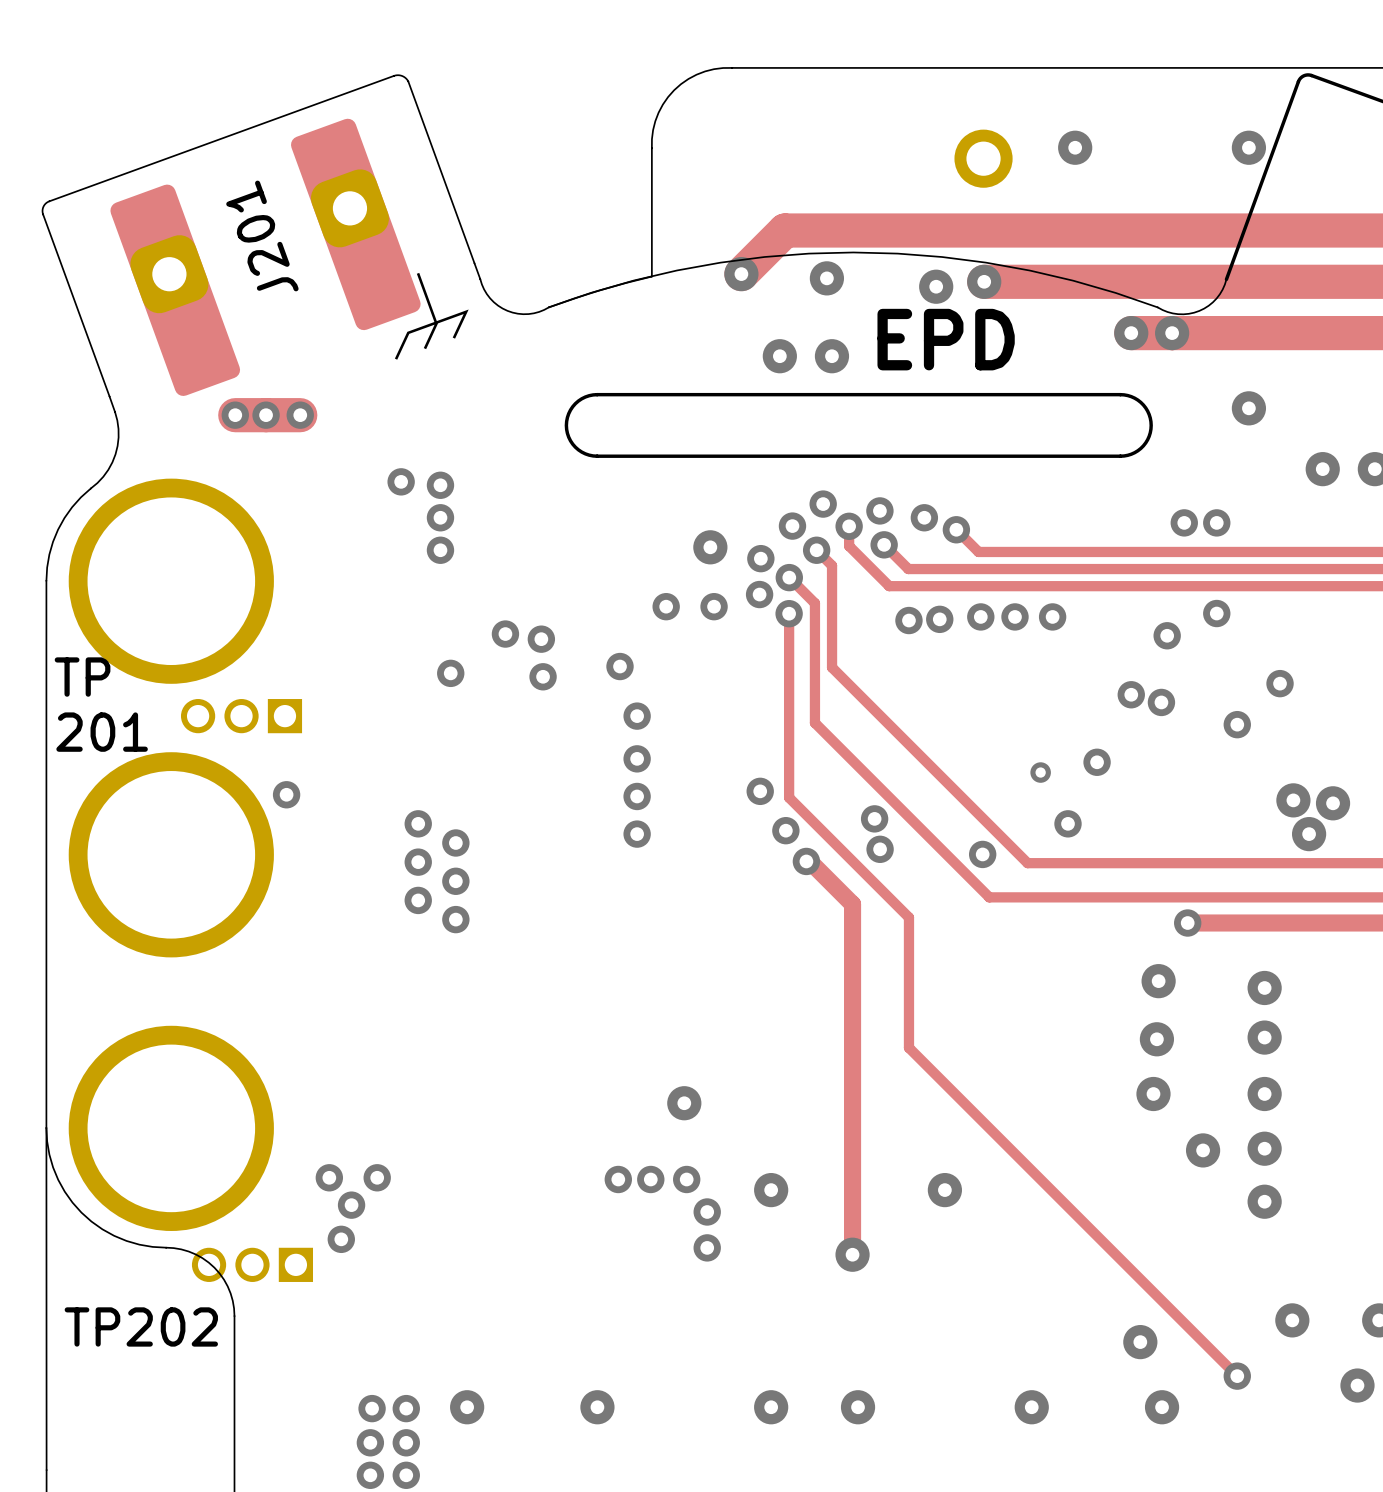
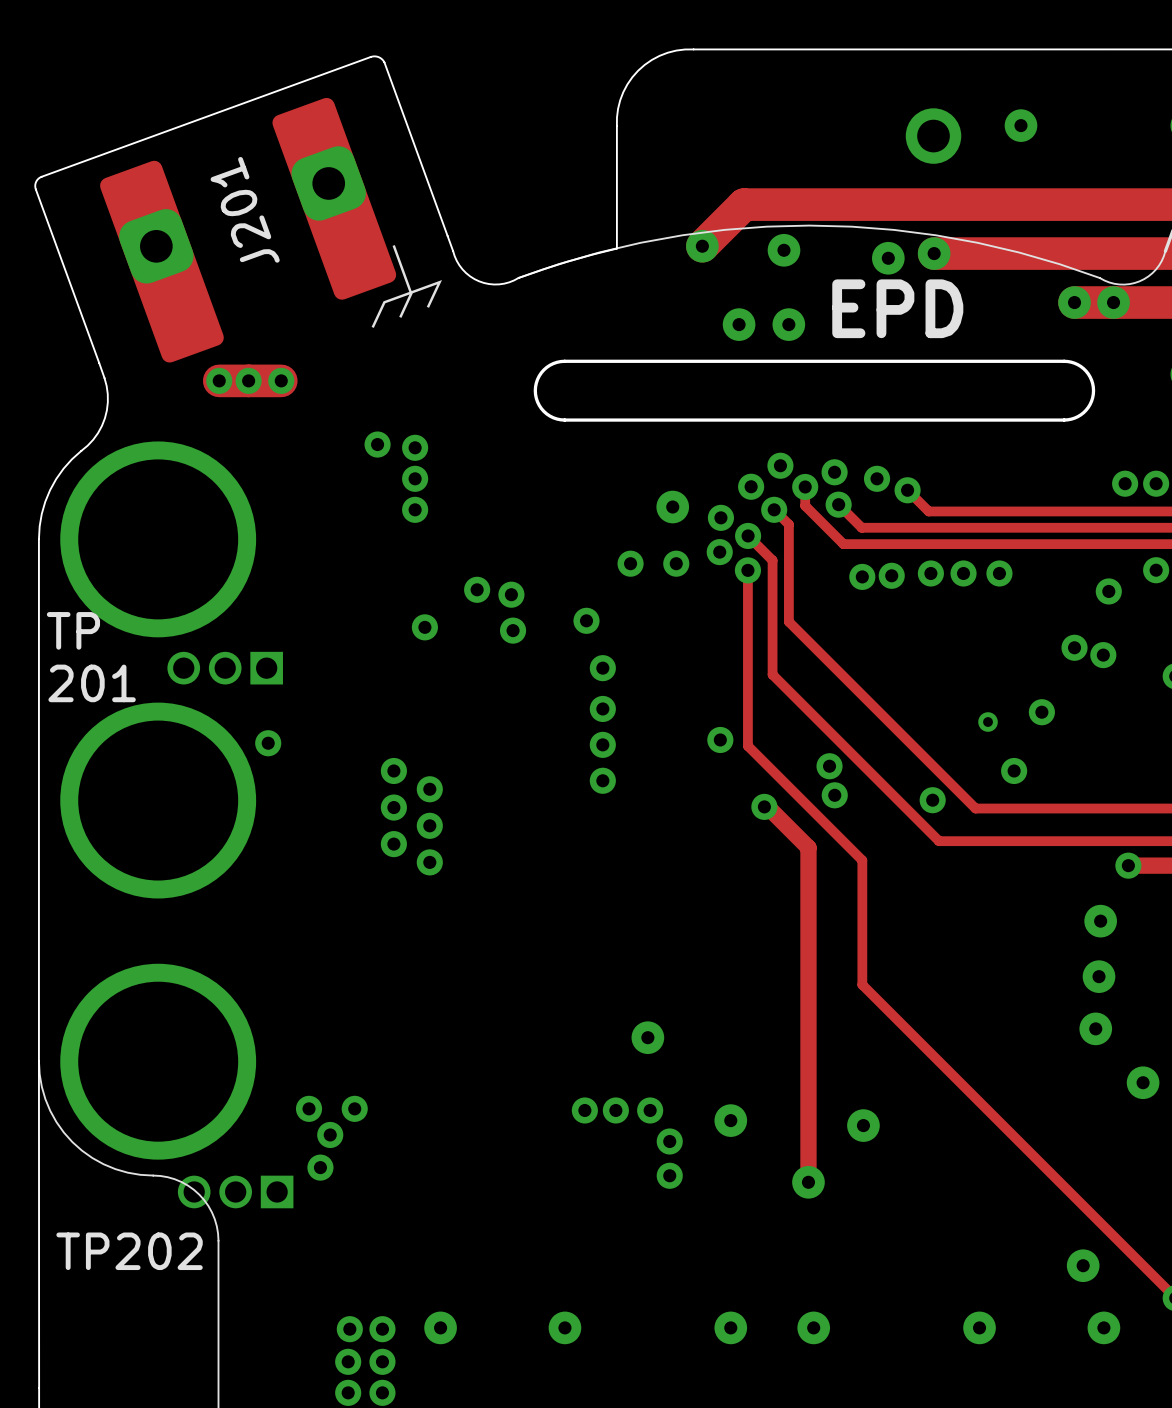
via: (785, 830) -> none
via position: (944, 1190) -> (863, 1125)

